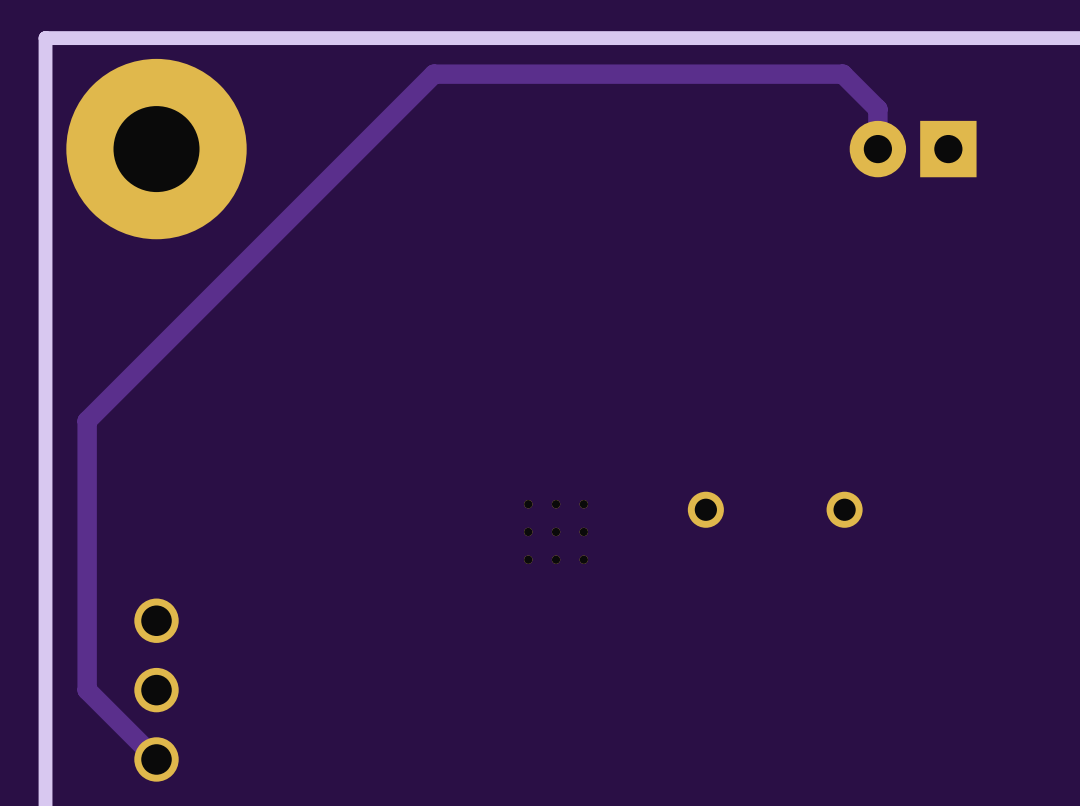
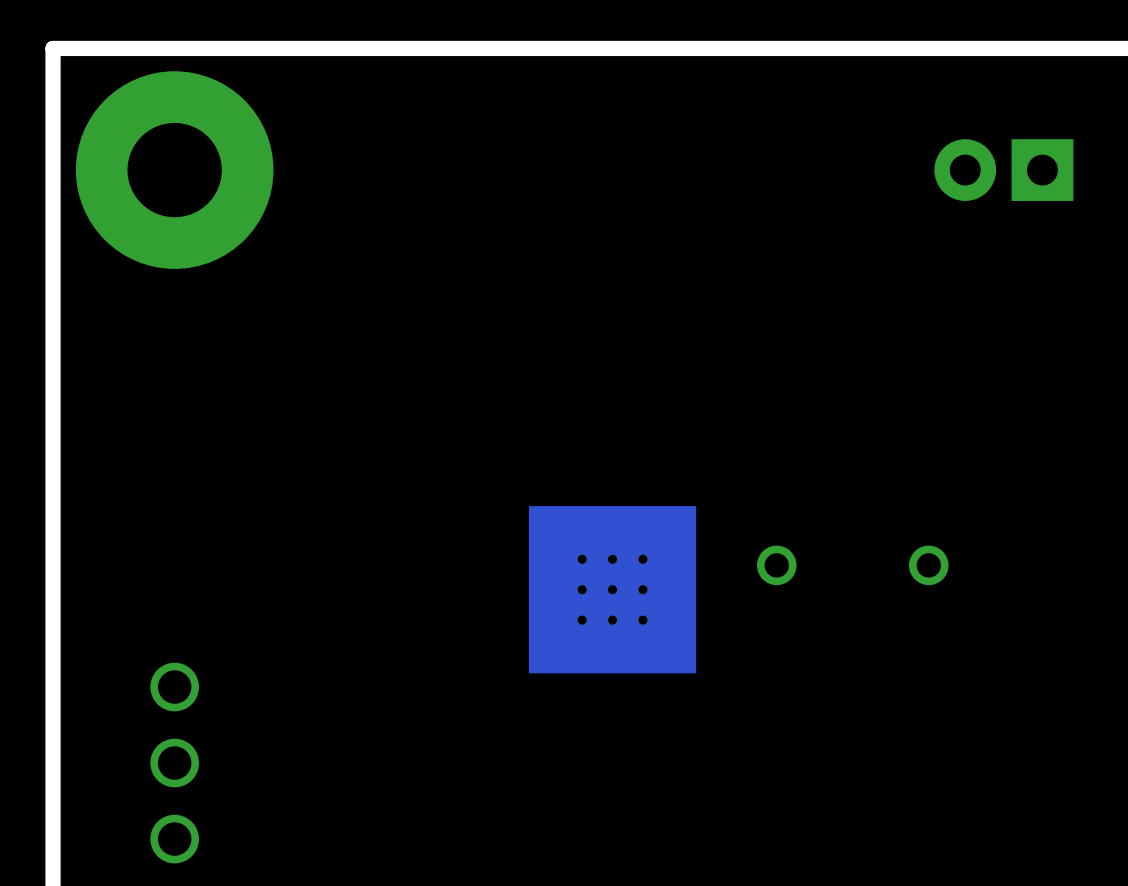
track: (877, 149) (877, 109) (842, 74) (433, 74) (87, 420) (87, 690) (156, 759) -> none
part footprint: [524, 500, 588, 564] -> [528, 506, 697, 674]

